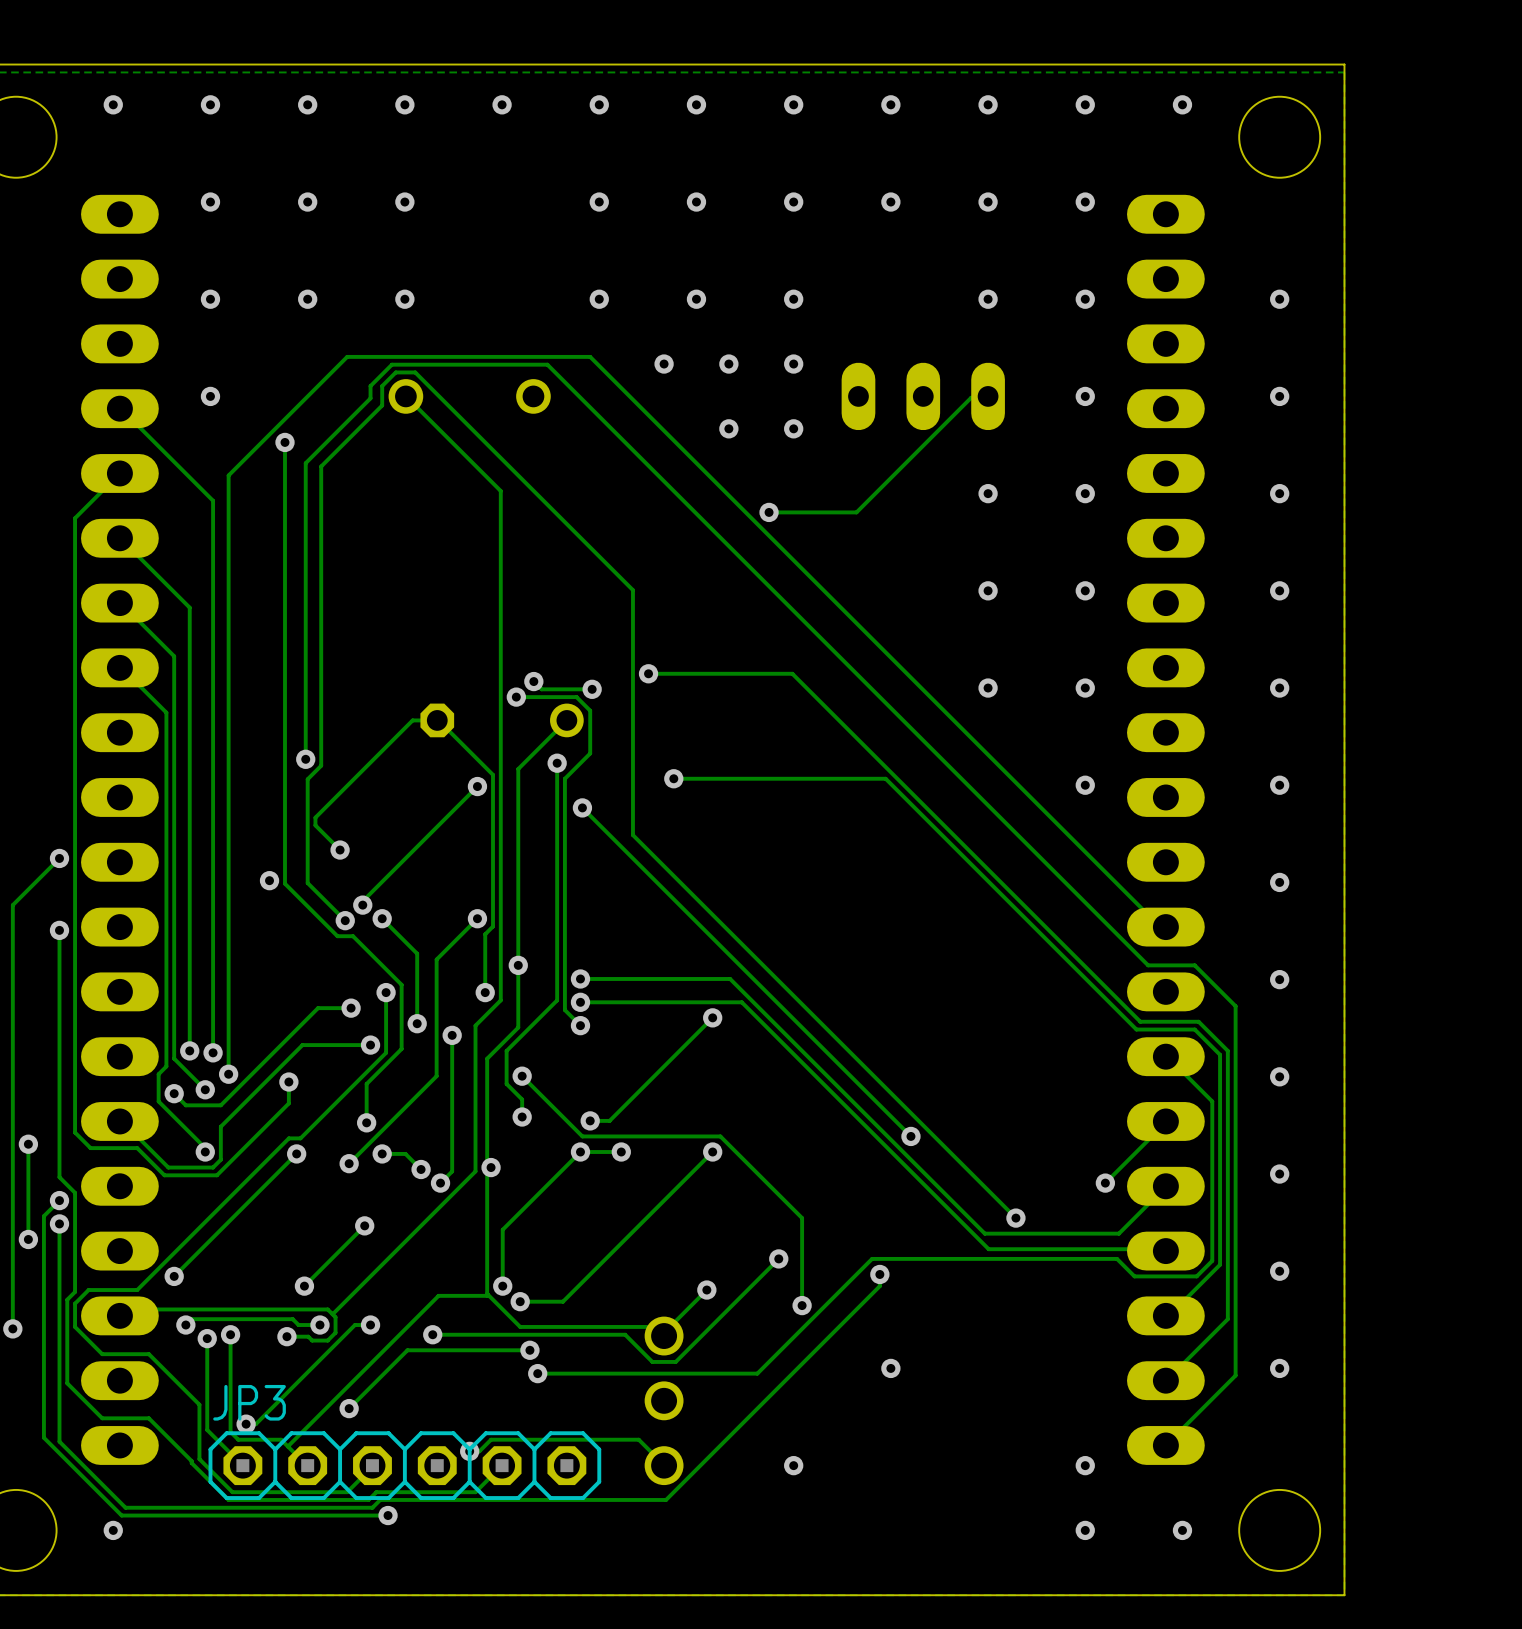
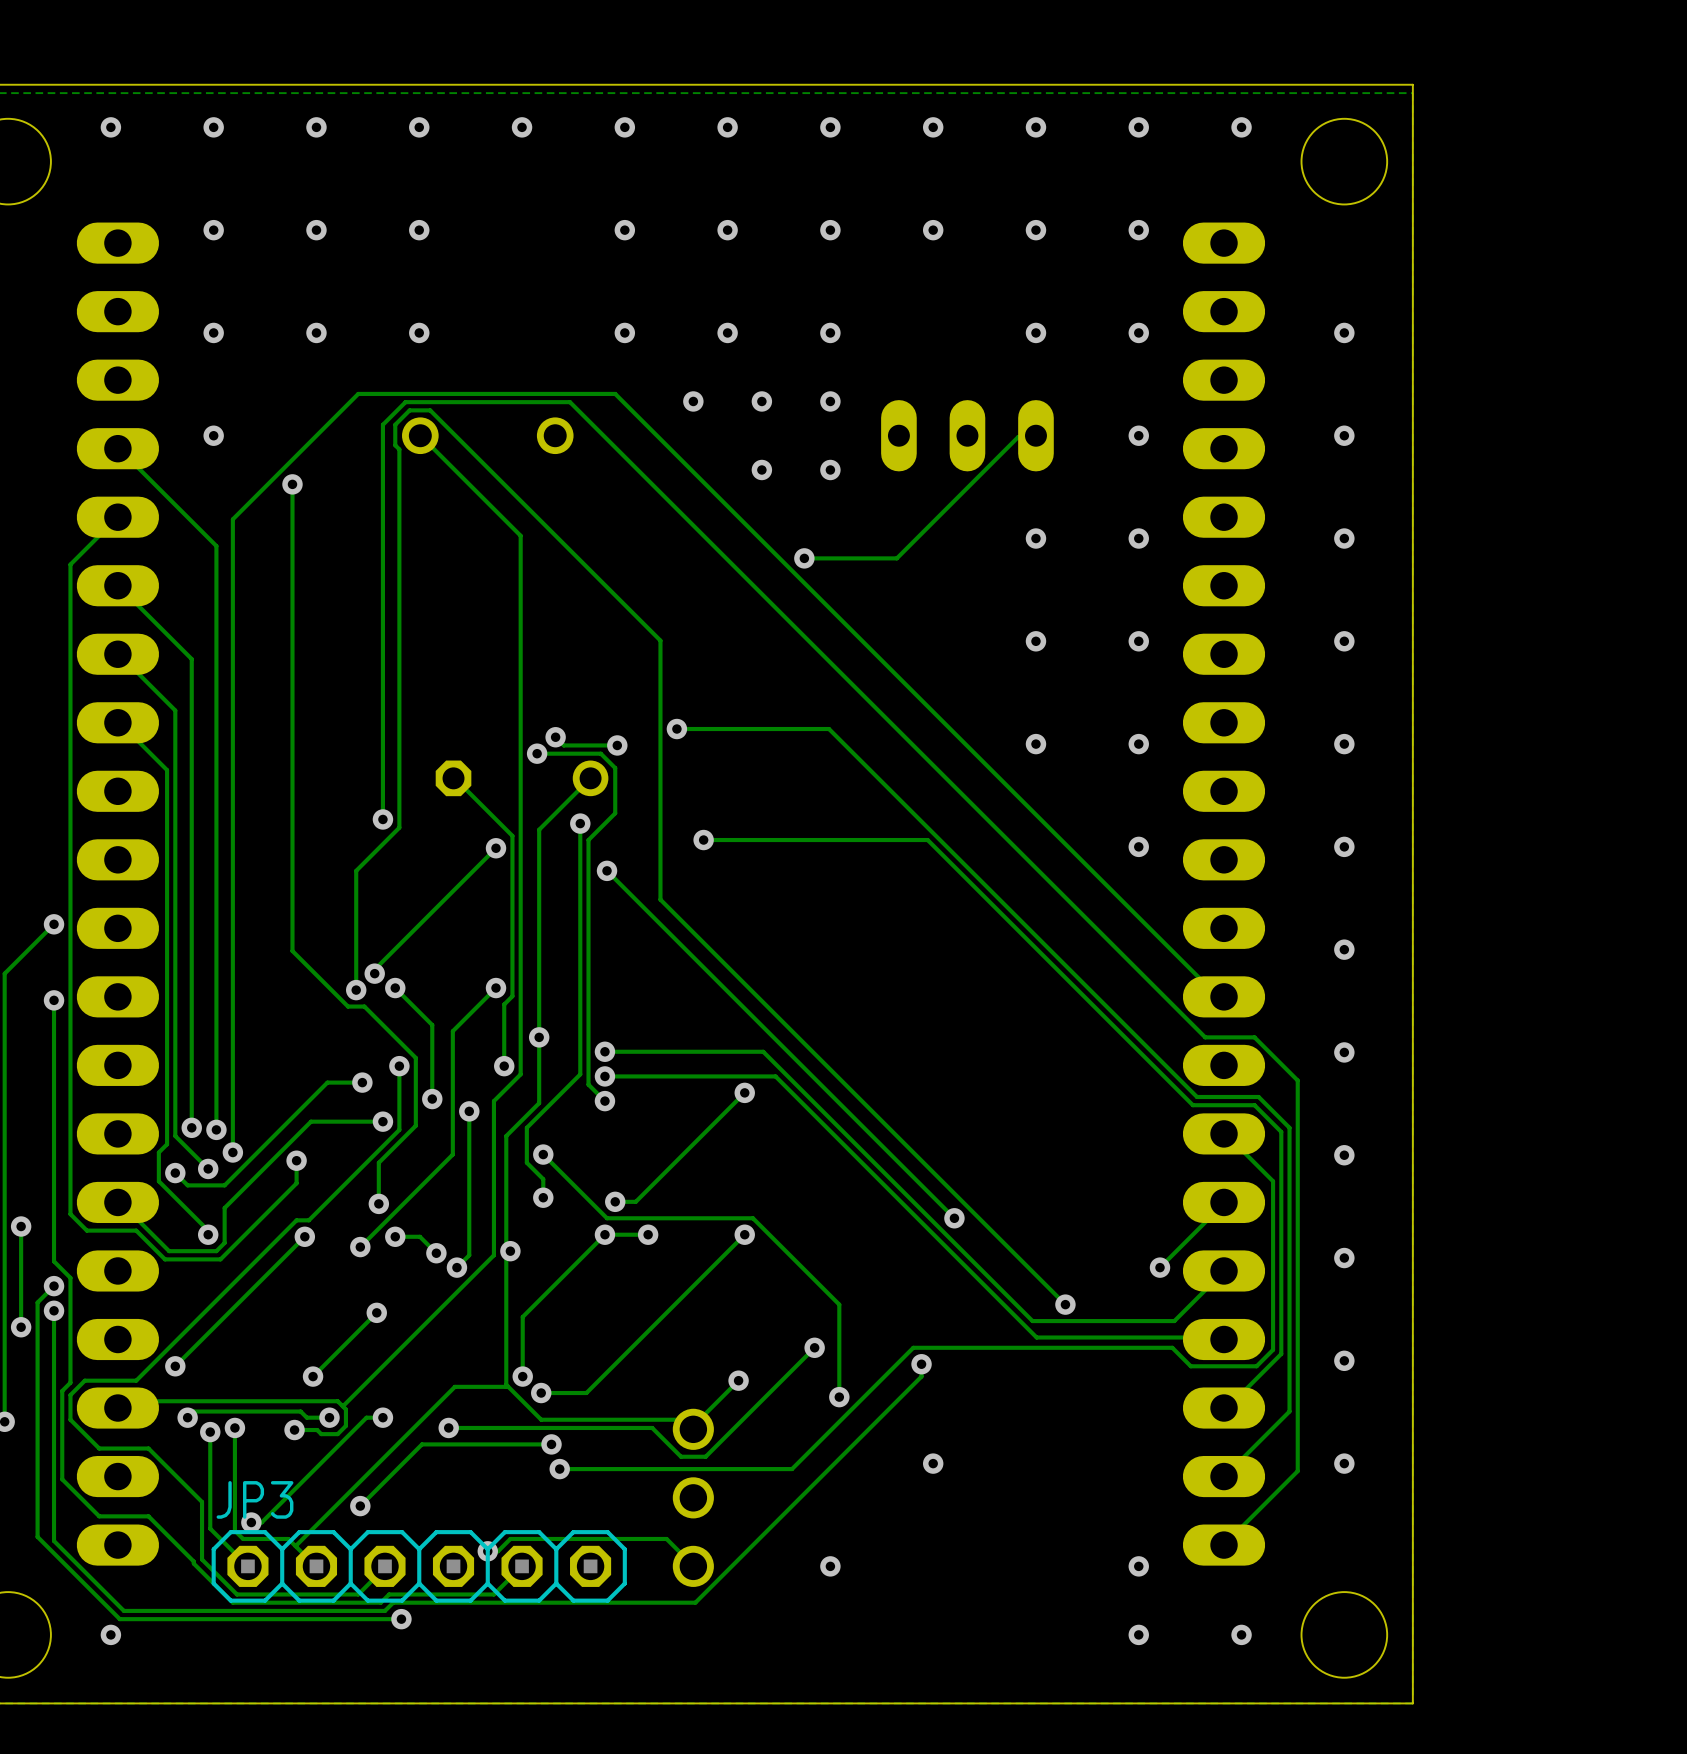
track: (370, 398) (305, 463) (305, 759) -> (382, 437) (382, 819)
track: (382, 405) (321, 466) (321, 765) (307, 779) (307, 883) (345, 920) -> (395, 445) (399, 449) (399, 827) (356, 870) (356, 990)
track: (437, 720) (412, 720) (315, 817) (315, 825) (340, 850) -> none
via: (305, 759) -> none
via: none -> (382, 819)
via: (340, 850) -> none
via: (269, 880) -> none

